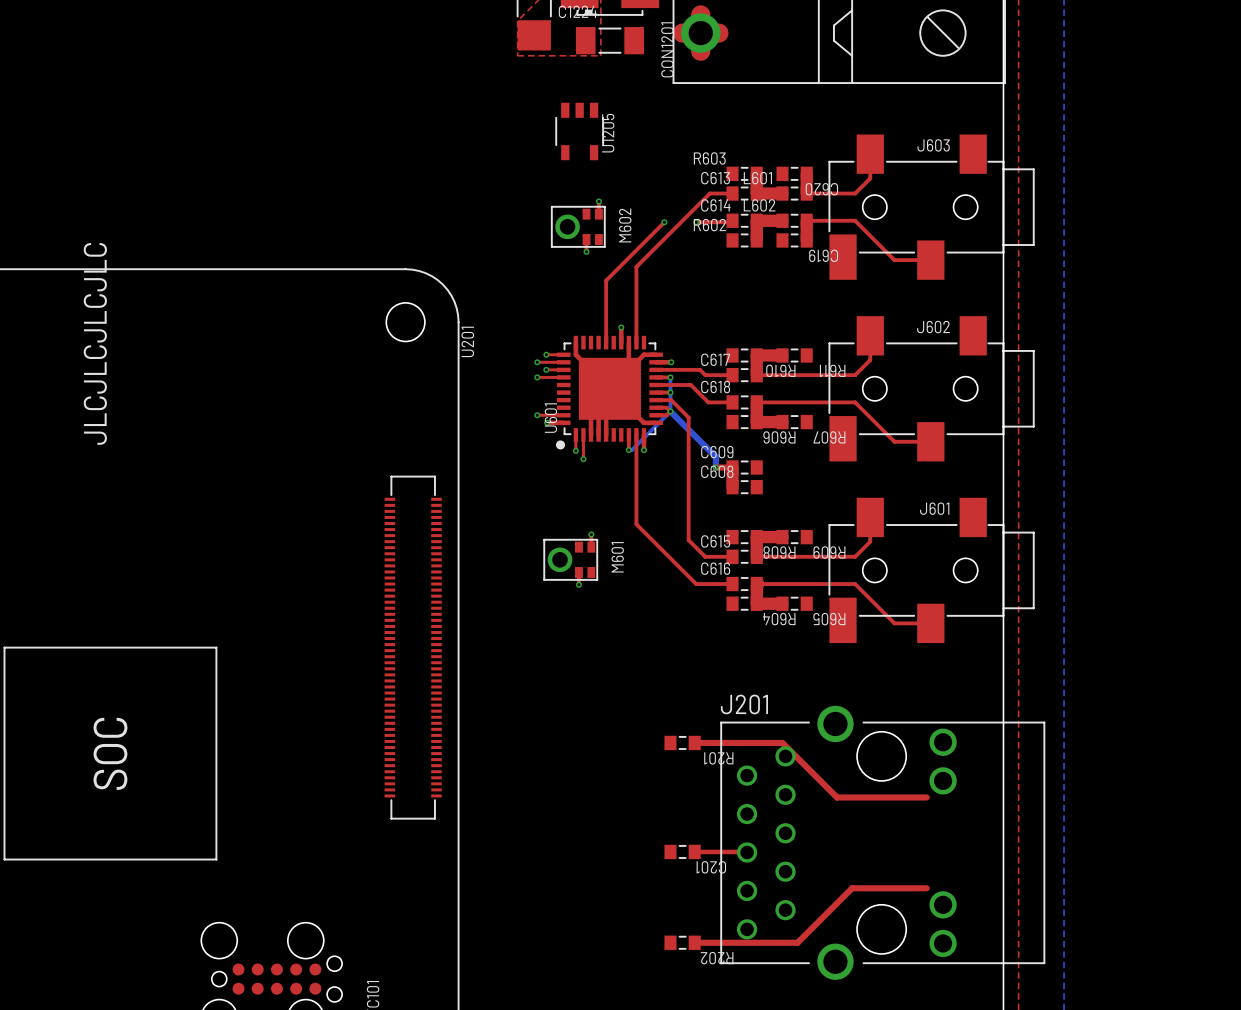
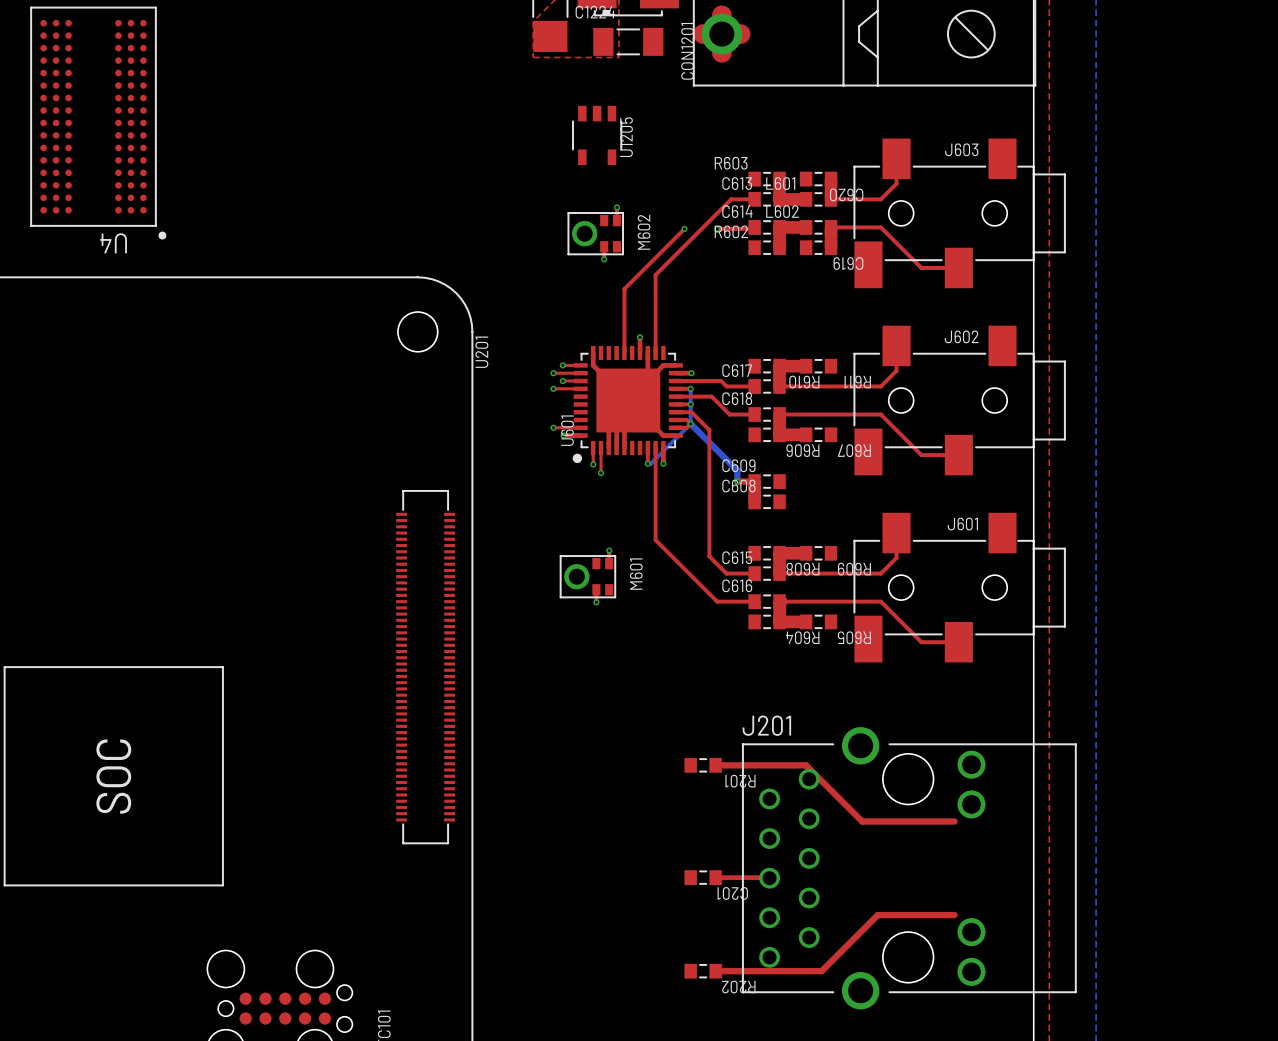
U4: none -> (98, 123)
text: JLCJLCJLCJLC (95, 343) -> none

